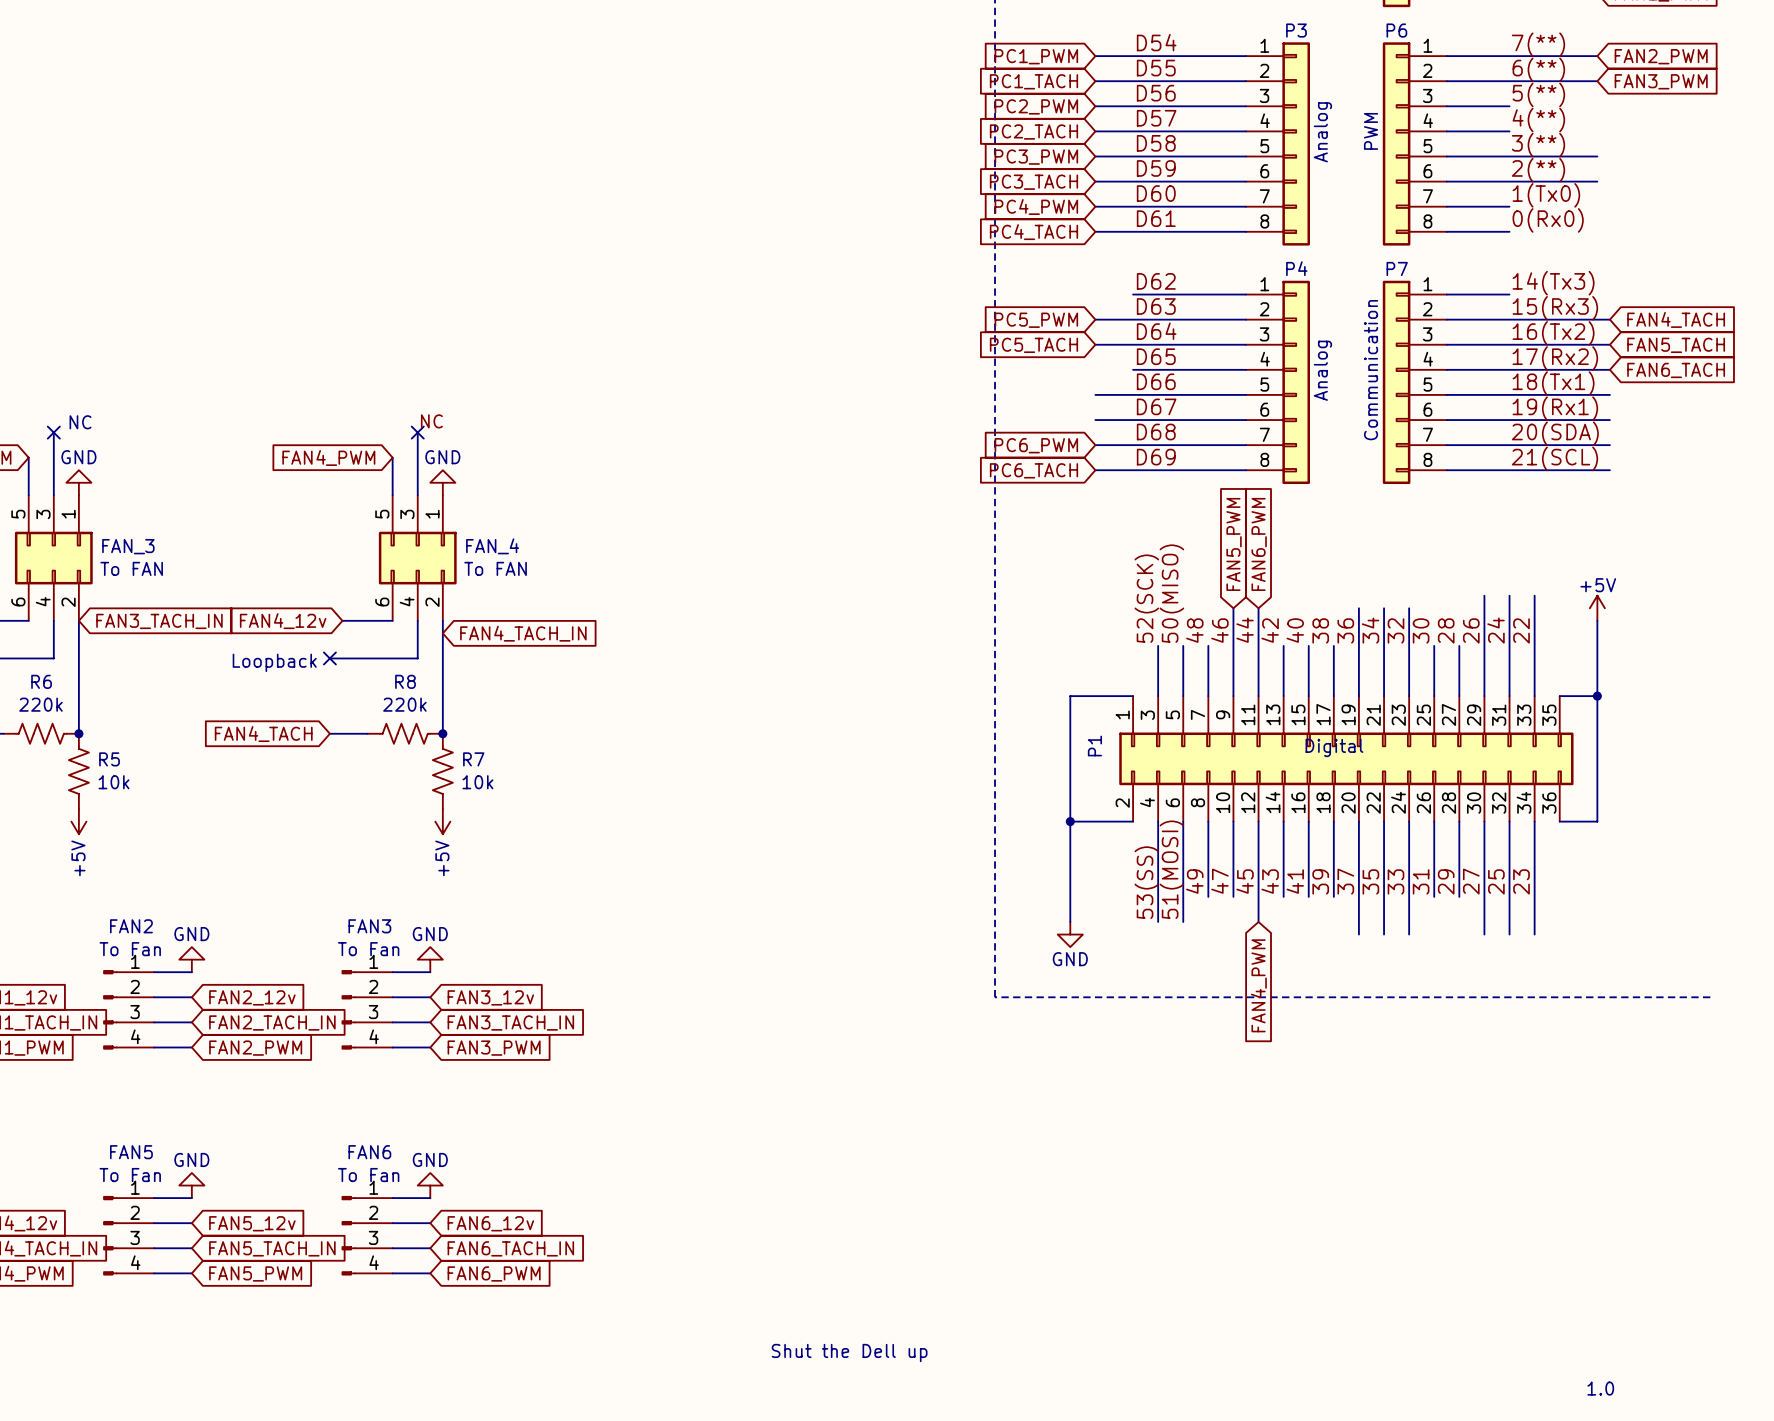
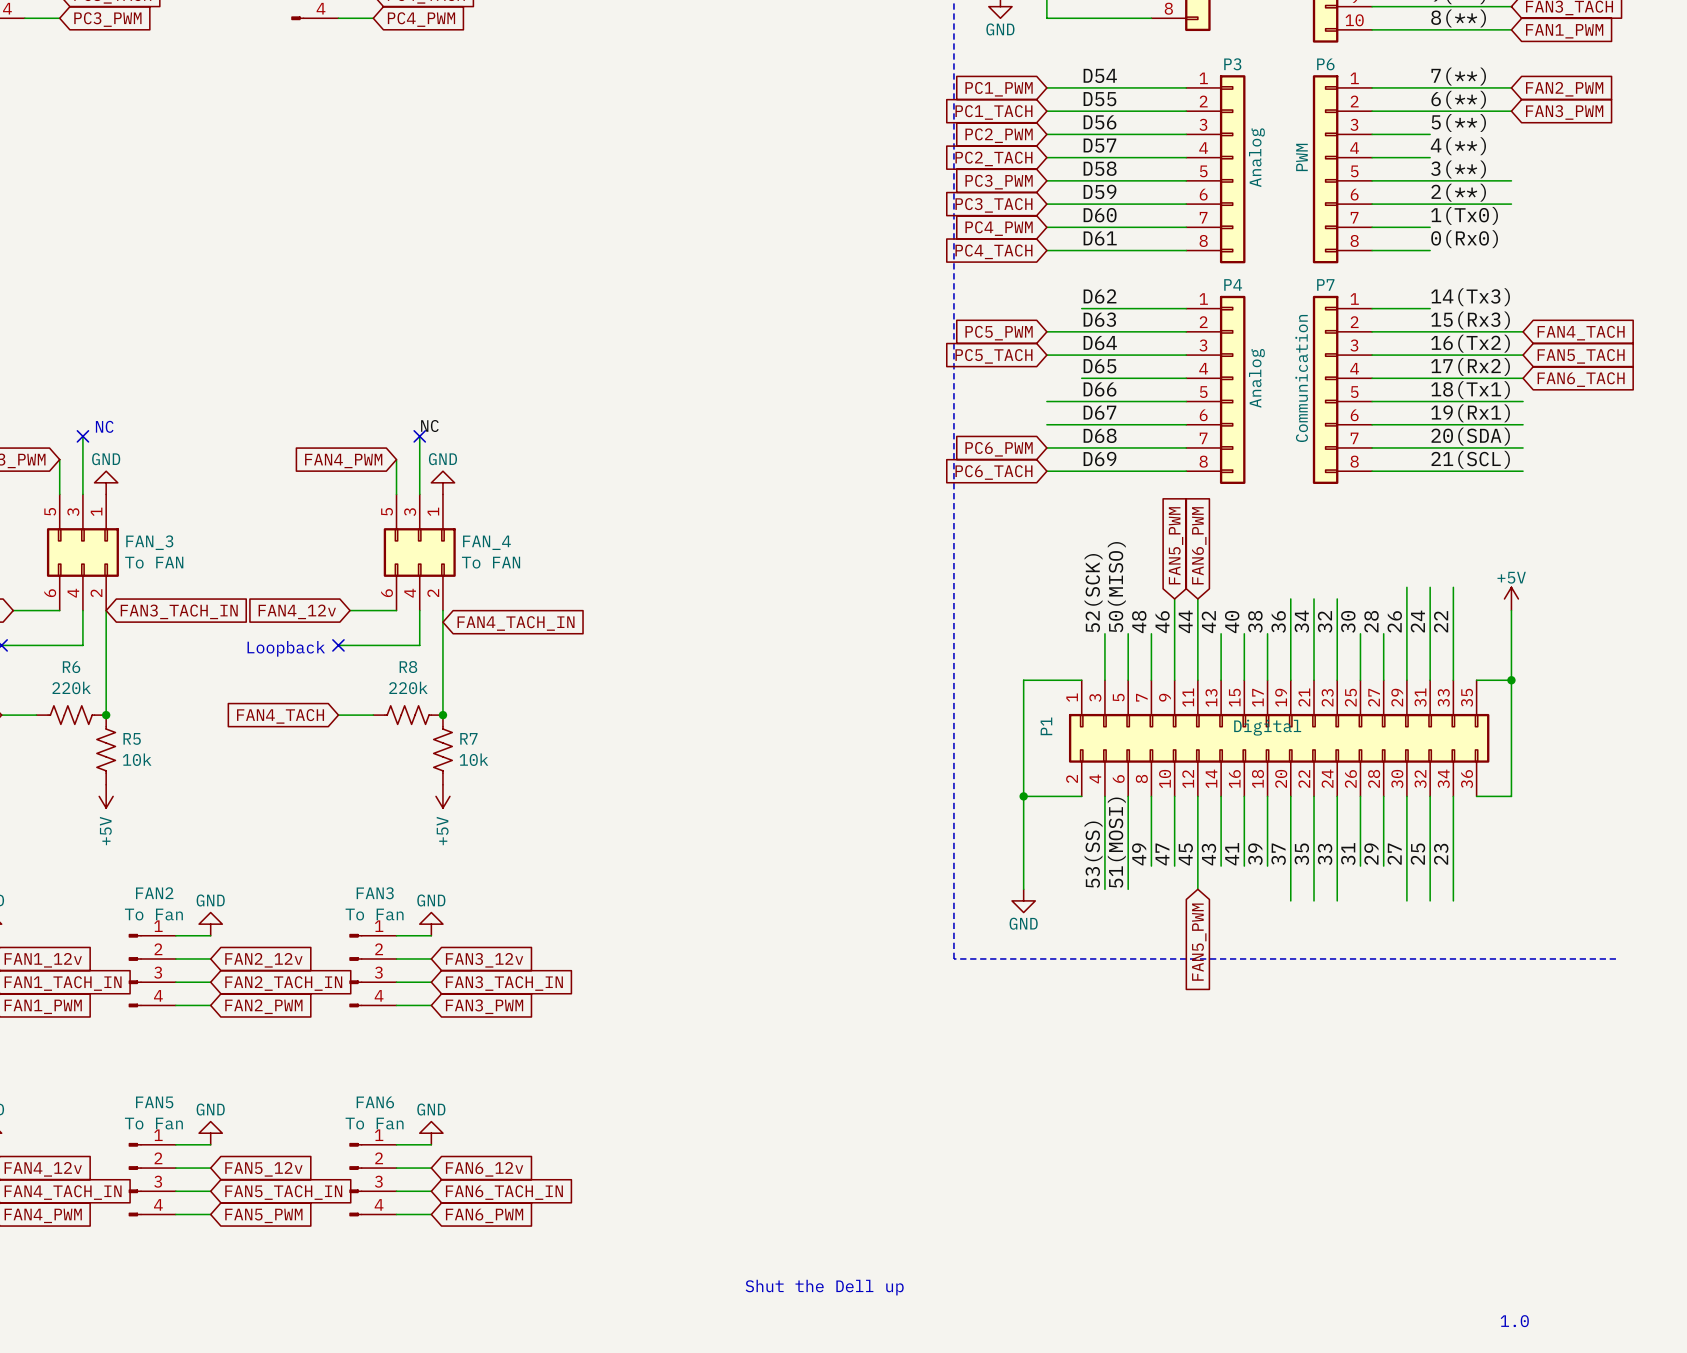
global label: FAN4_PWM (1258, 985) -> FAN5_PWM (1199, 942)

